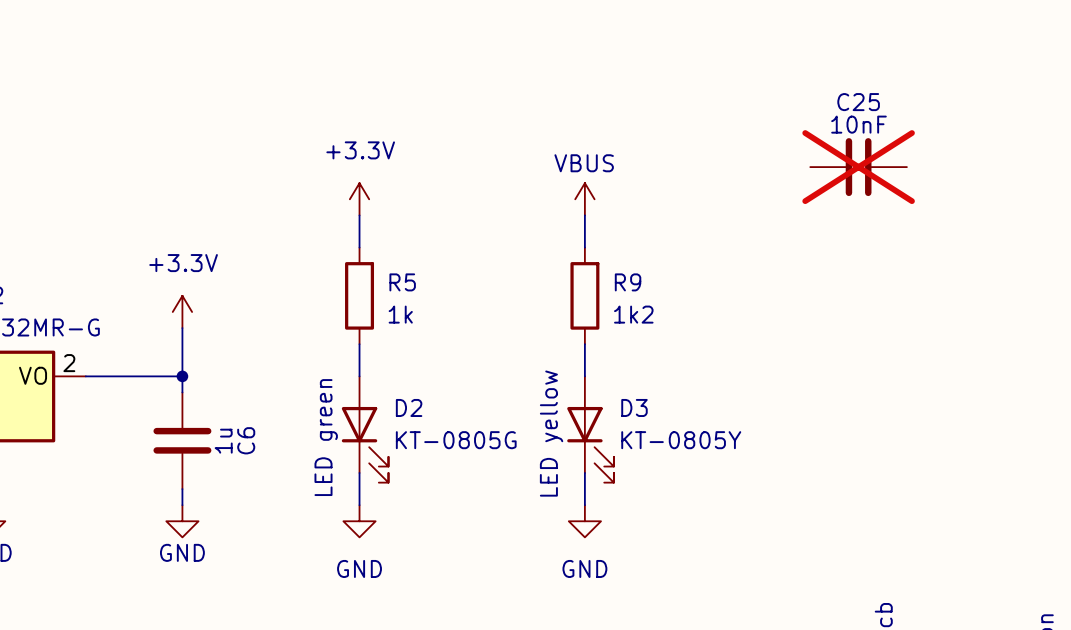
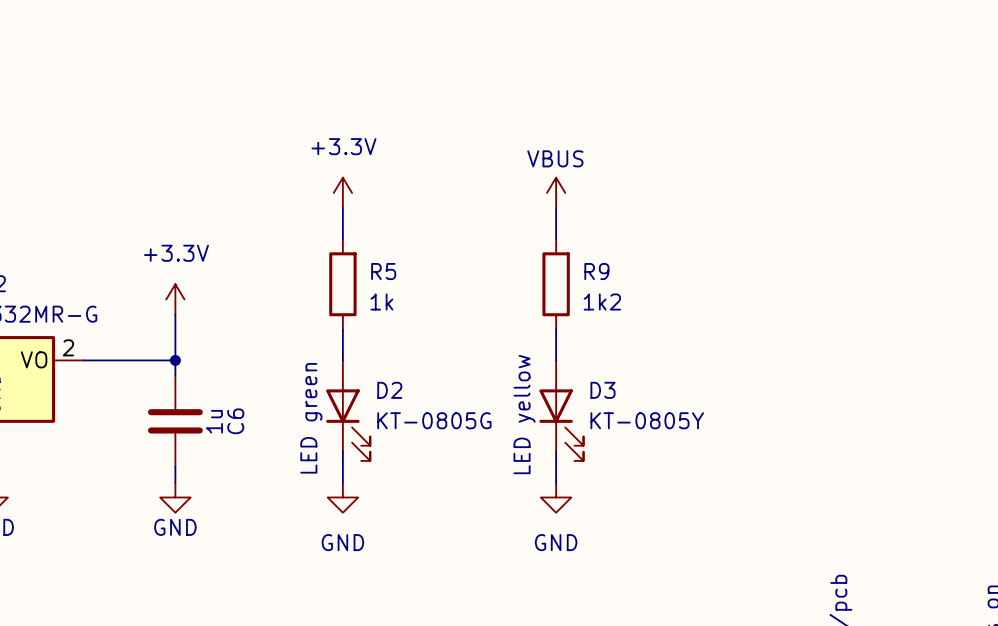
C25: 10nF (858, 167) -> none

